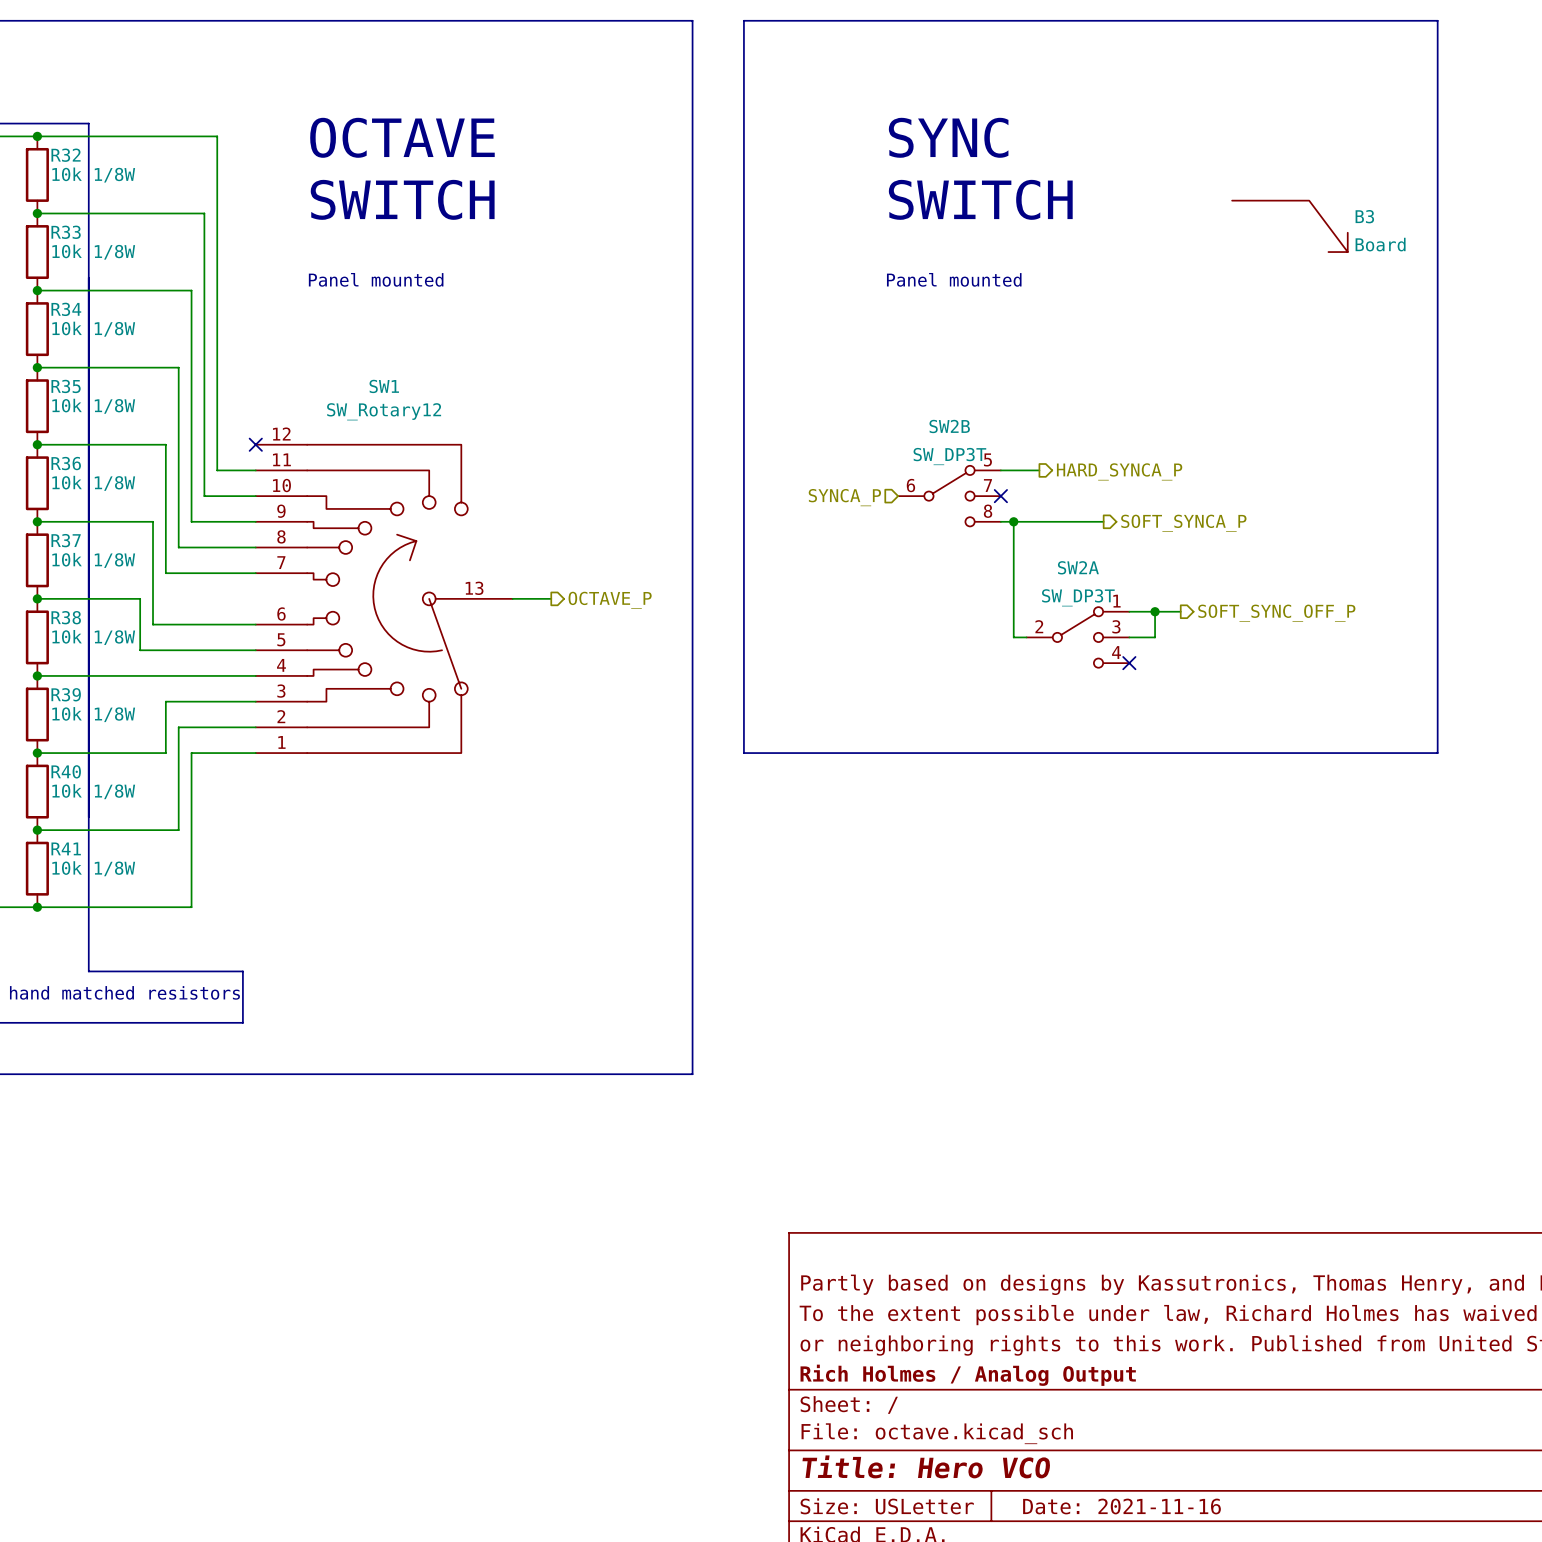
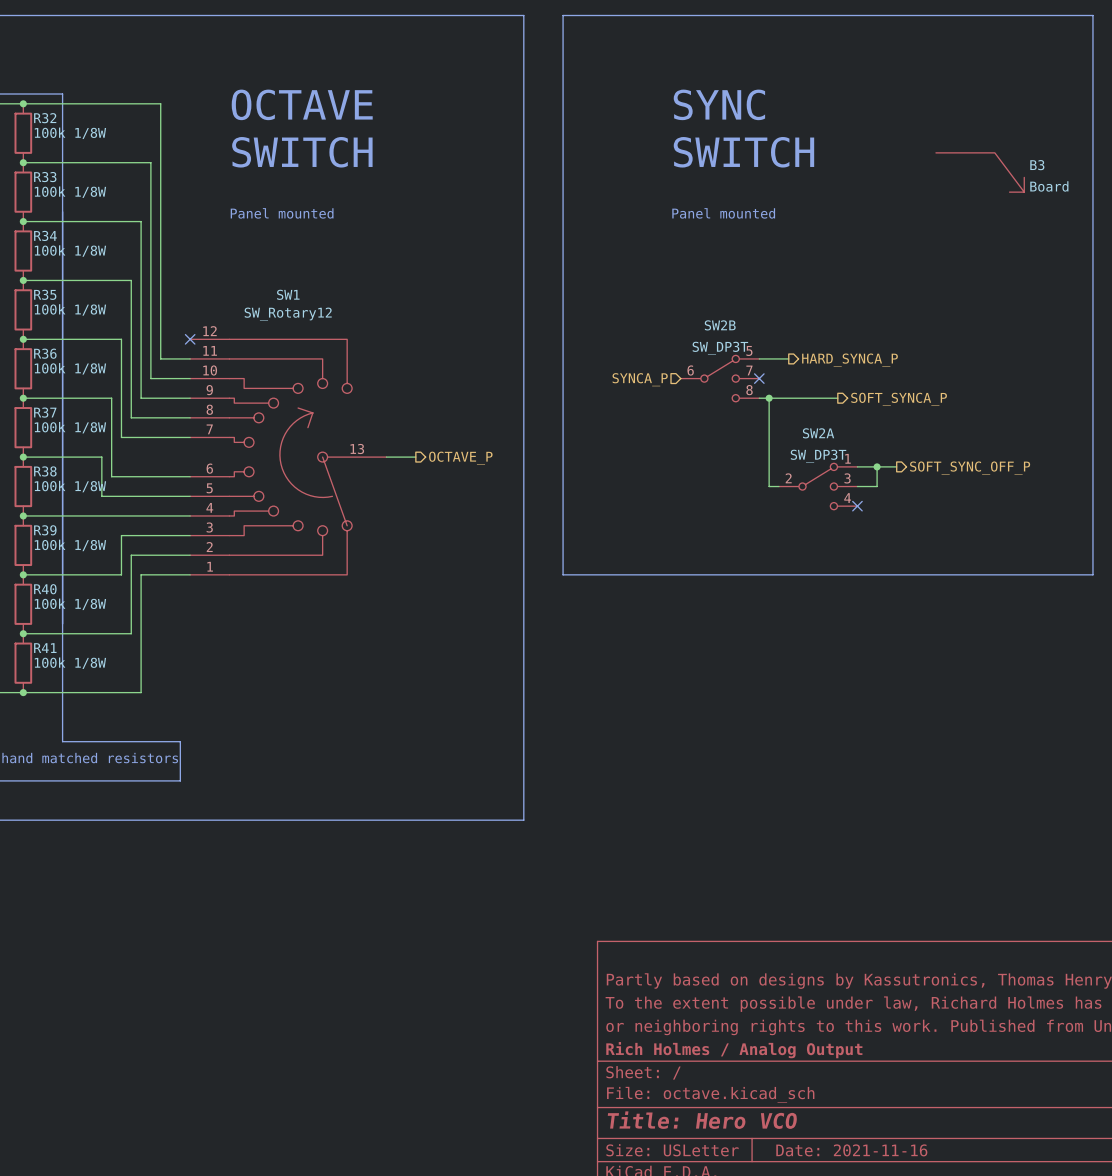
R32 value: 10k 1/8W (93, 175) -> 100k 1/8W (70, 133)
R33 value: 10k 1/8W (93, 252) -> 100k 1/8W (70, 192)
R34 value: 10k 1/8W (93, 329) -> 100k 1/8W (70, 251)
R35 value: 10k 1/8W (93, 406) -> 100k 1/8W (70, 309)
R36 value: 10k 1/8W (93, 483) -> 100k 1/8W (70, 368)
R37 value: 10k 1/8W (93, 560) -> 100k 1/8W (70, 427)
R38 value: 10k 1/8W (93, 637) -> 100k 1/8W (70, 486)
R39 value: 10k 1/8W (93, 714) -> 100k 1/8W (70, 545)
R40 value: 10k 1/8W (93, 791) -> 100k 1/8W (70, 604)
R41 value: 10k 1/8W (93, 868) -> 100k 1/8W (70, 663)

